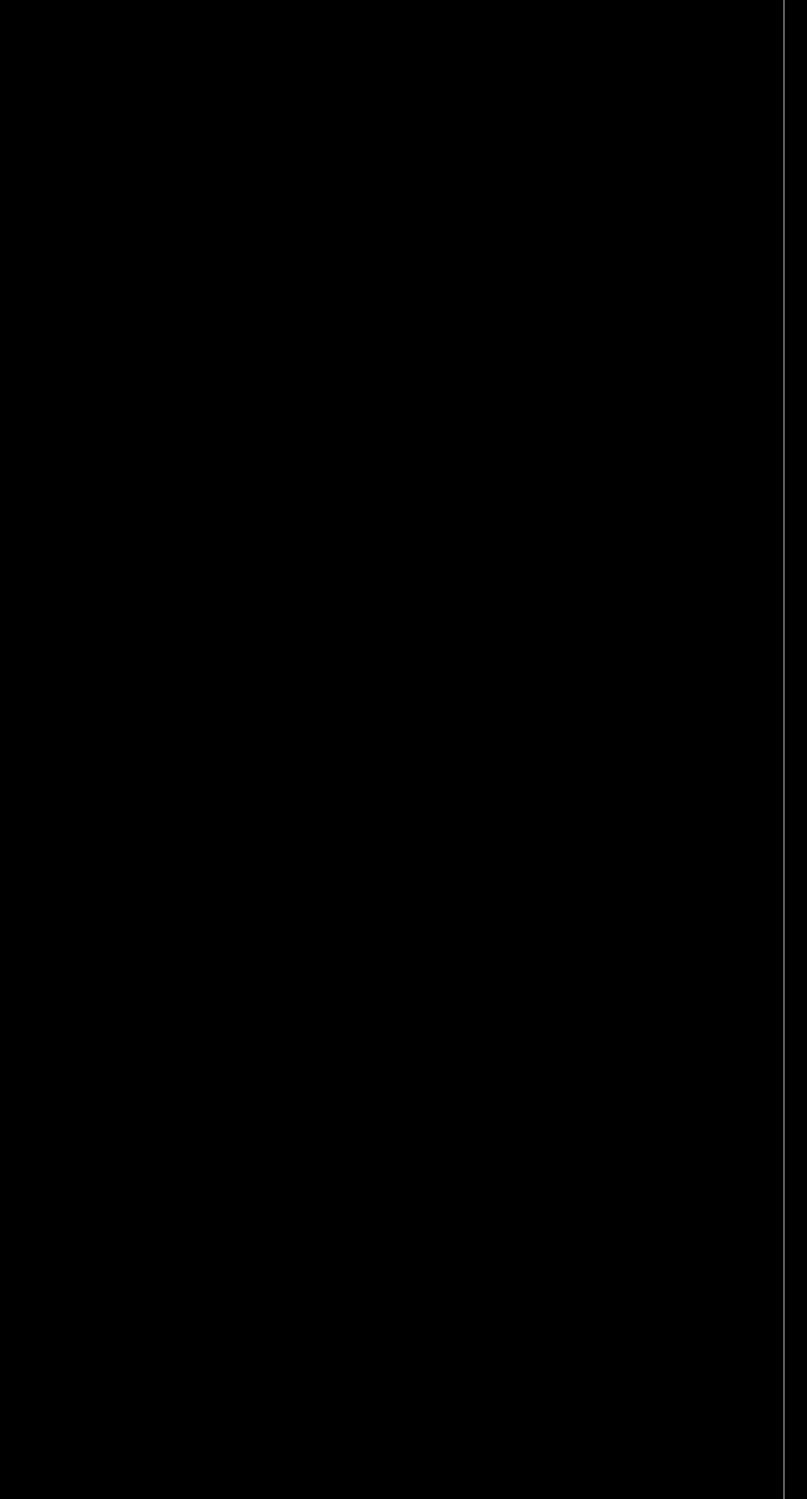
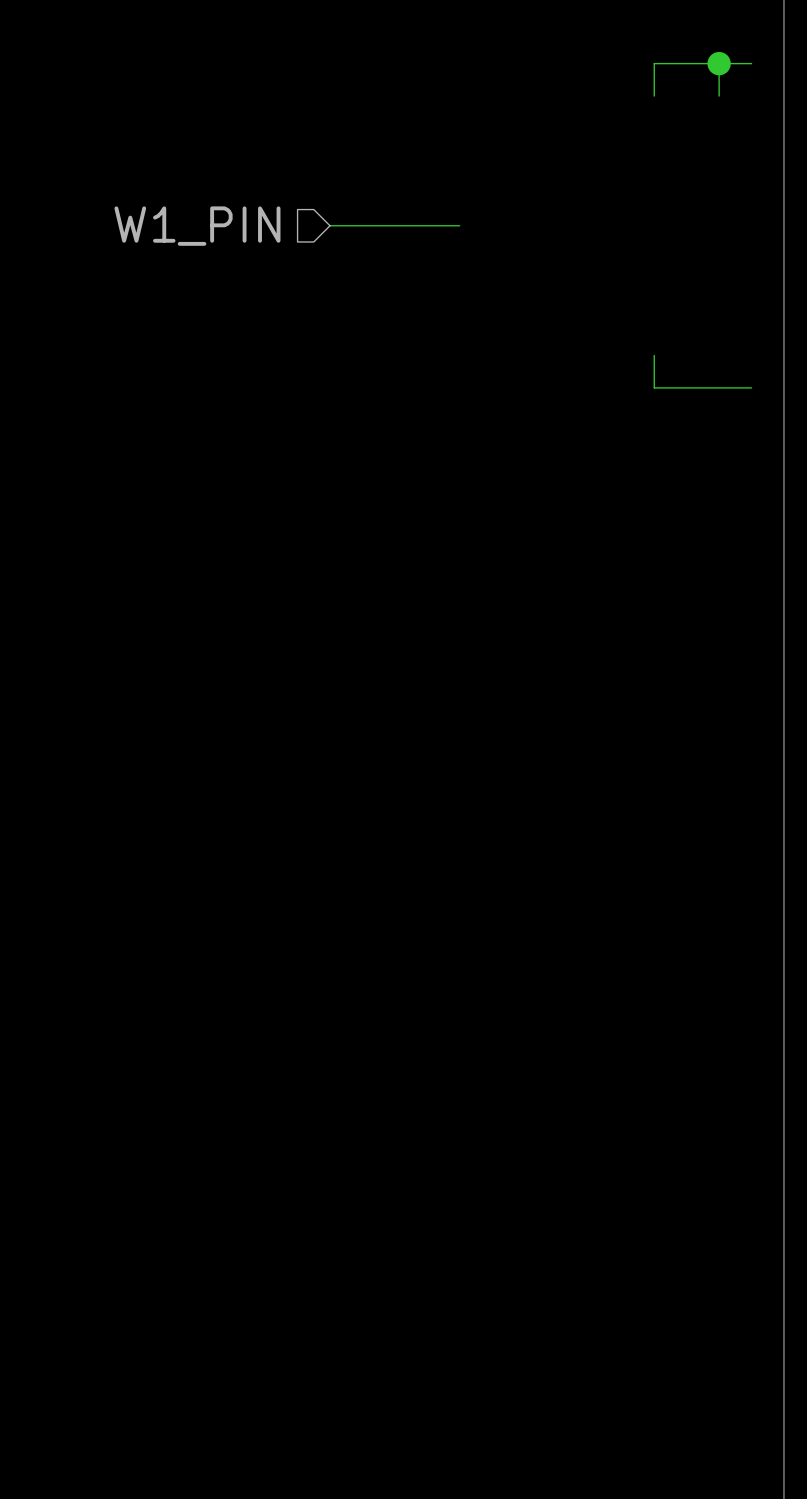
wire: none -> (719, 63) (719, 96)
junction: none -> (719, 63)
wire: none -> (751, 63) (654, 63) (654, 96)
wire: none -> (329, 225) (459, 225)
hierarchical label: none -> W1_PIN (197, 226)
wire: none -> (654, 355) (654, 387) (751, 387)

